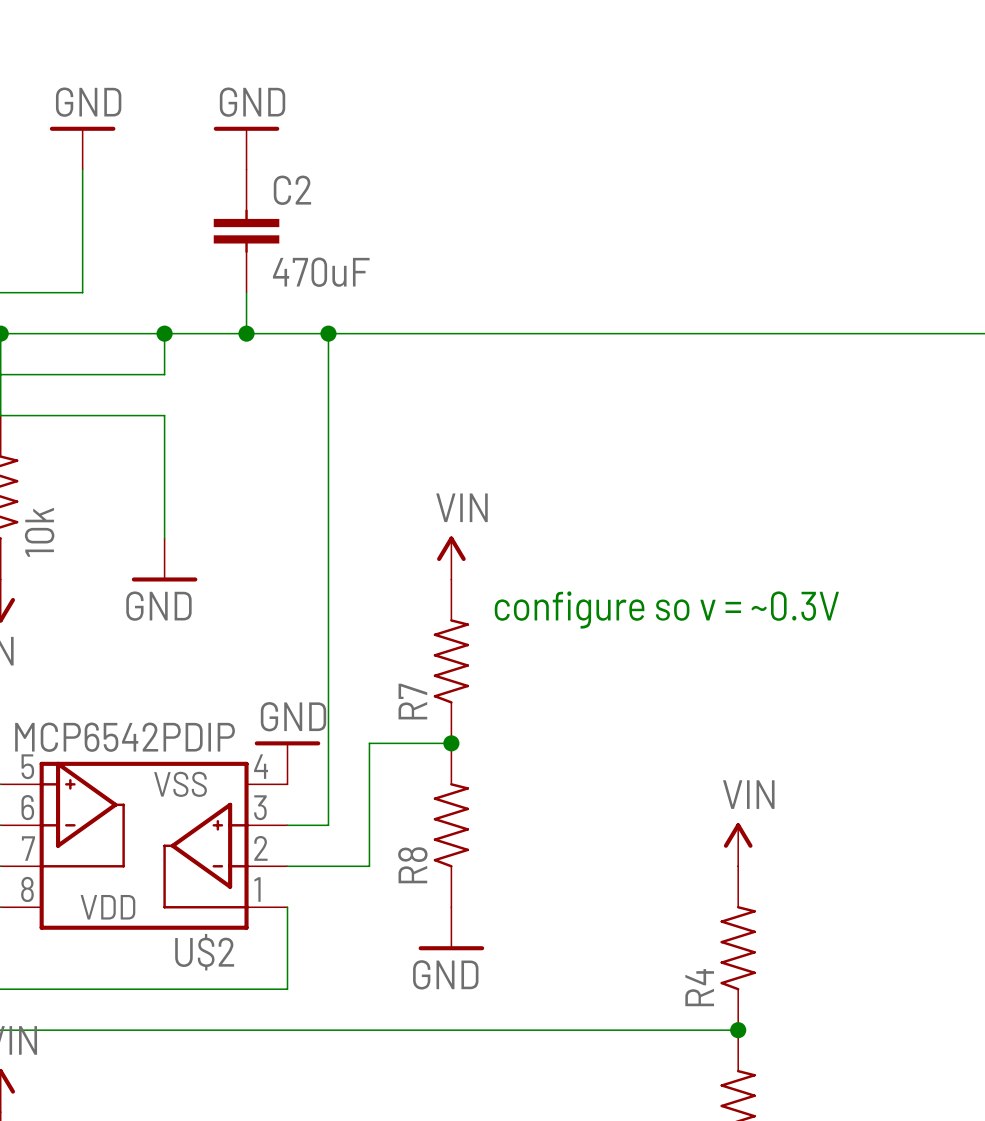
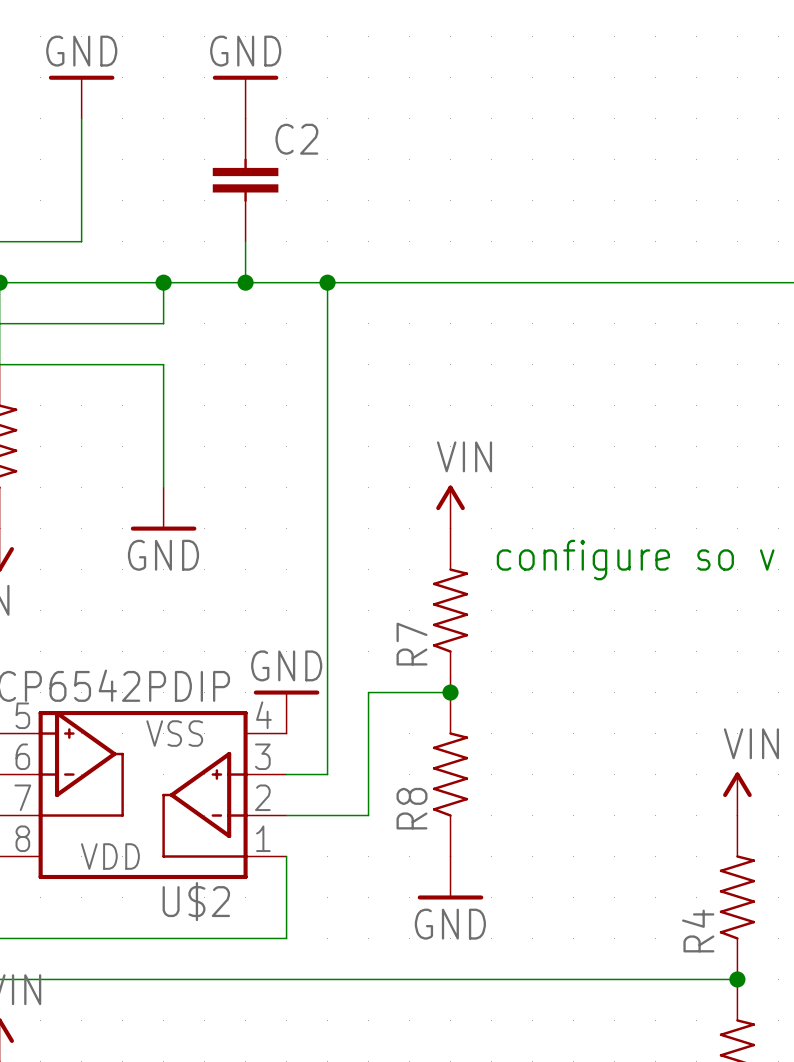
C2 value: 470uF (321, 272) -> none
part value: 10k (39, 532) -> none

